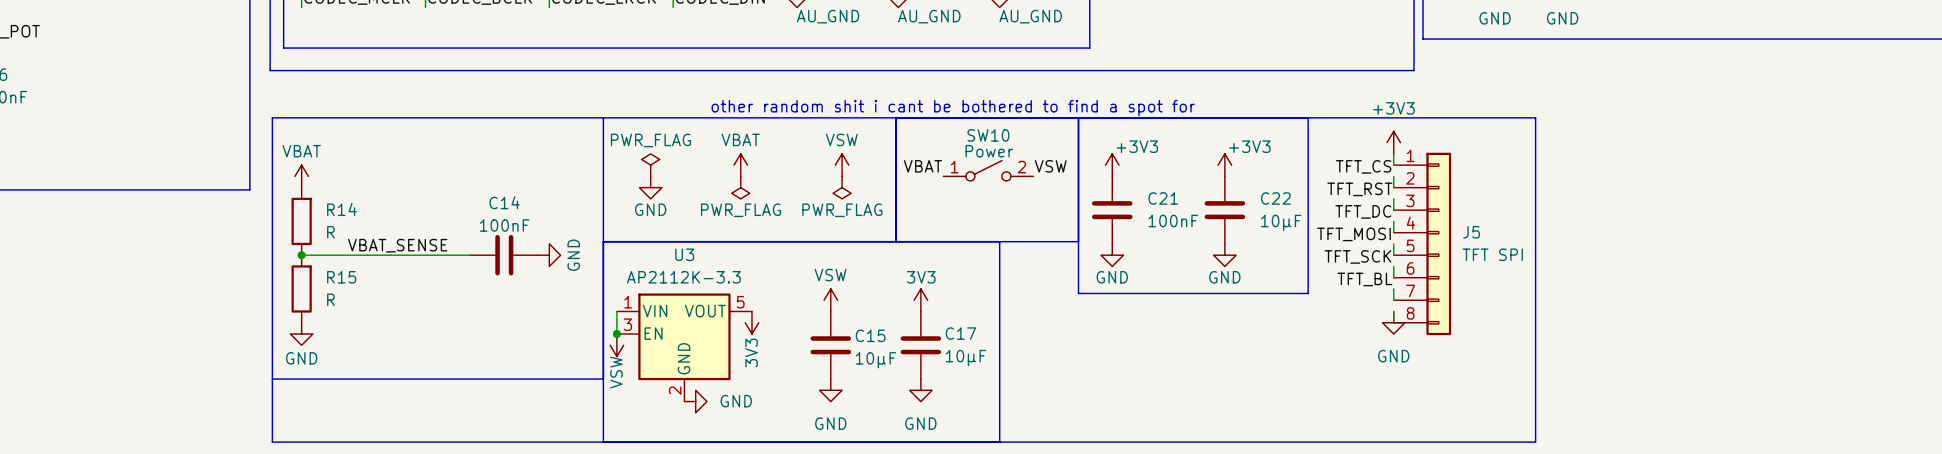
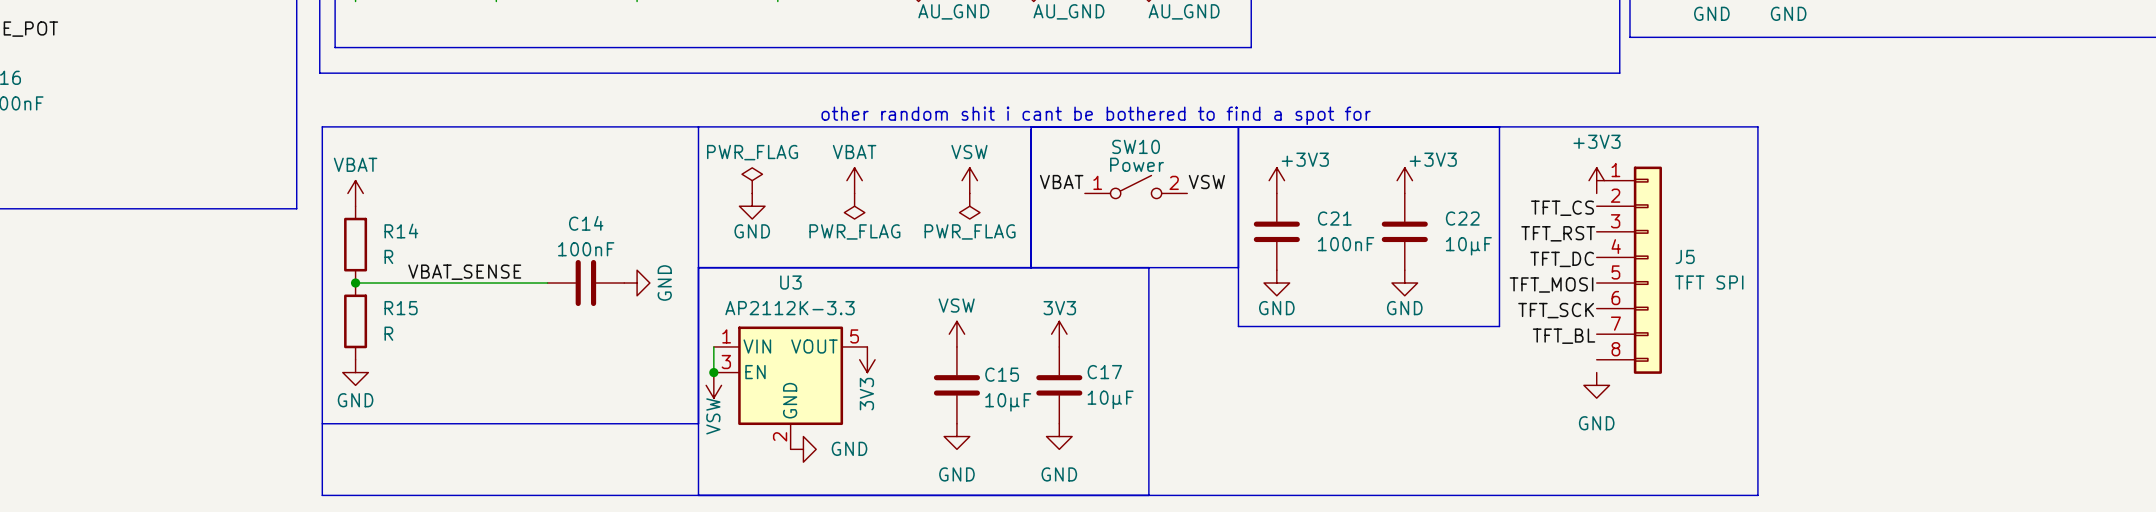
power symbol position: +3V3 (1393, 142) -> +3V3 (1596, 180)
label: TFT_CS (1363, 166) -> none
wire: (1393, 176) (1393, 187) -> none
label: TFT_RST (1359, 189) -> TFT_CS (1562, 208)
wire: (1393, 198) (1393, 210) -> none
label: TFT_DC (1363, 211) -> TFT_RST (1558, 233)
wire: (1393, 221) (1393, 232) -> none
label: TFT_MOSI (1353, 234) -> TFT_DC (1562, 259)
wire: (1393, 243) (1393, 255) -> none
label: TFT_SCK (1358, 256) -> TFT_MOSI (1551, 284)
wire: (1393, 266) (1393, 277) -> none
label: TFT_BL (1364, 279) -> TFT_SCK (1556, 310)
wire: (1393, 288) (1393, 300) -> none
label: none -> TFT_BL (1564, 336)
wire: (1393, 311) (1393, 322) -> none
power symbol position: GND (1393, 322) -> GND (1596, 385)

